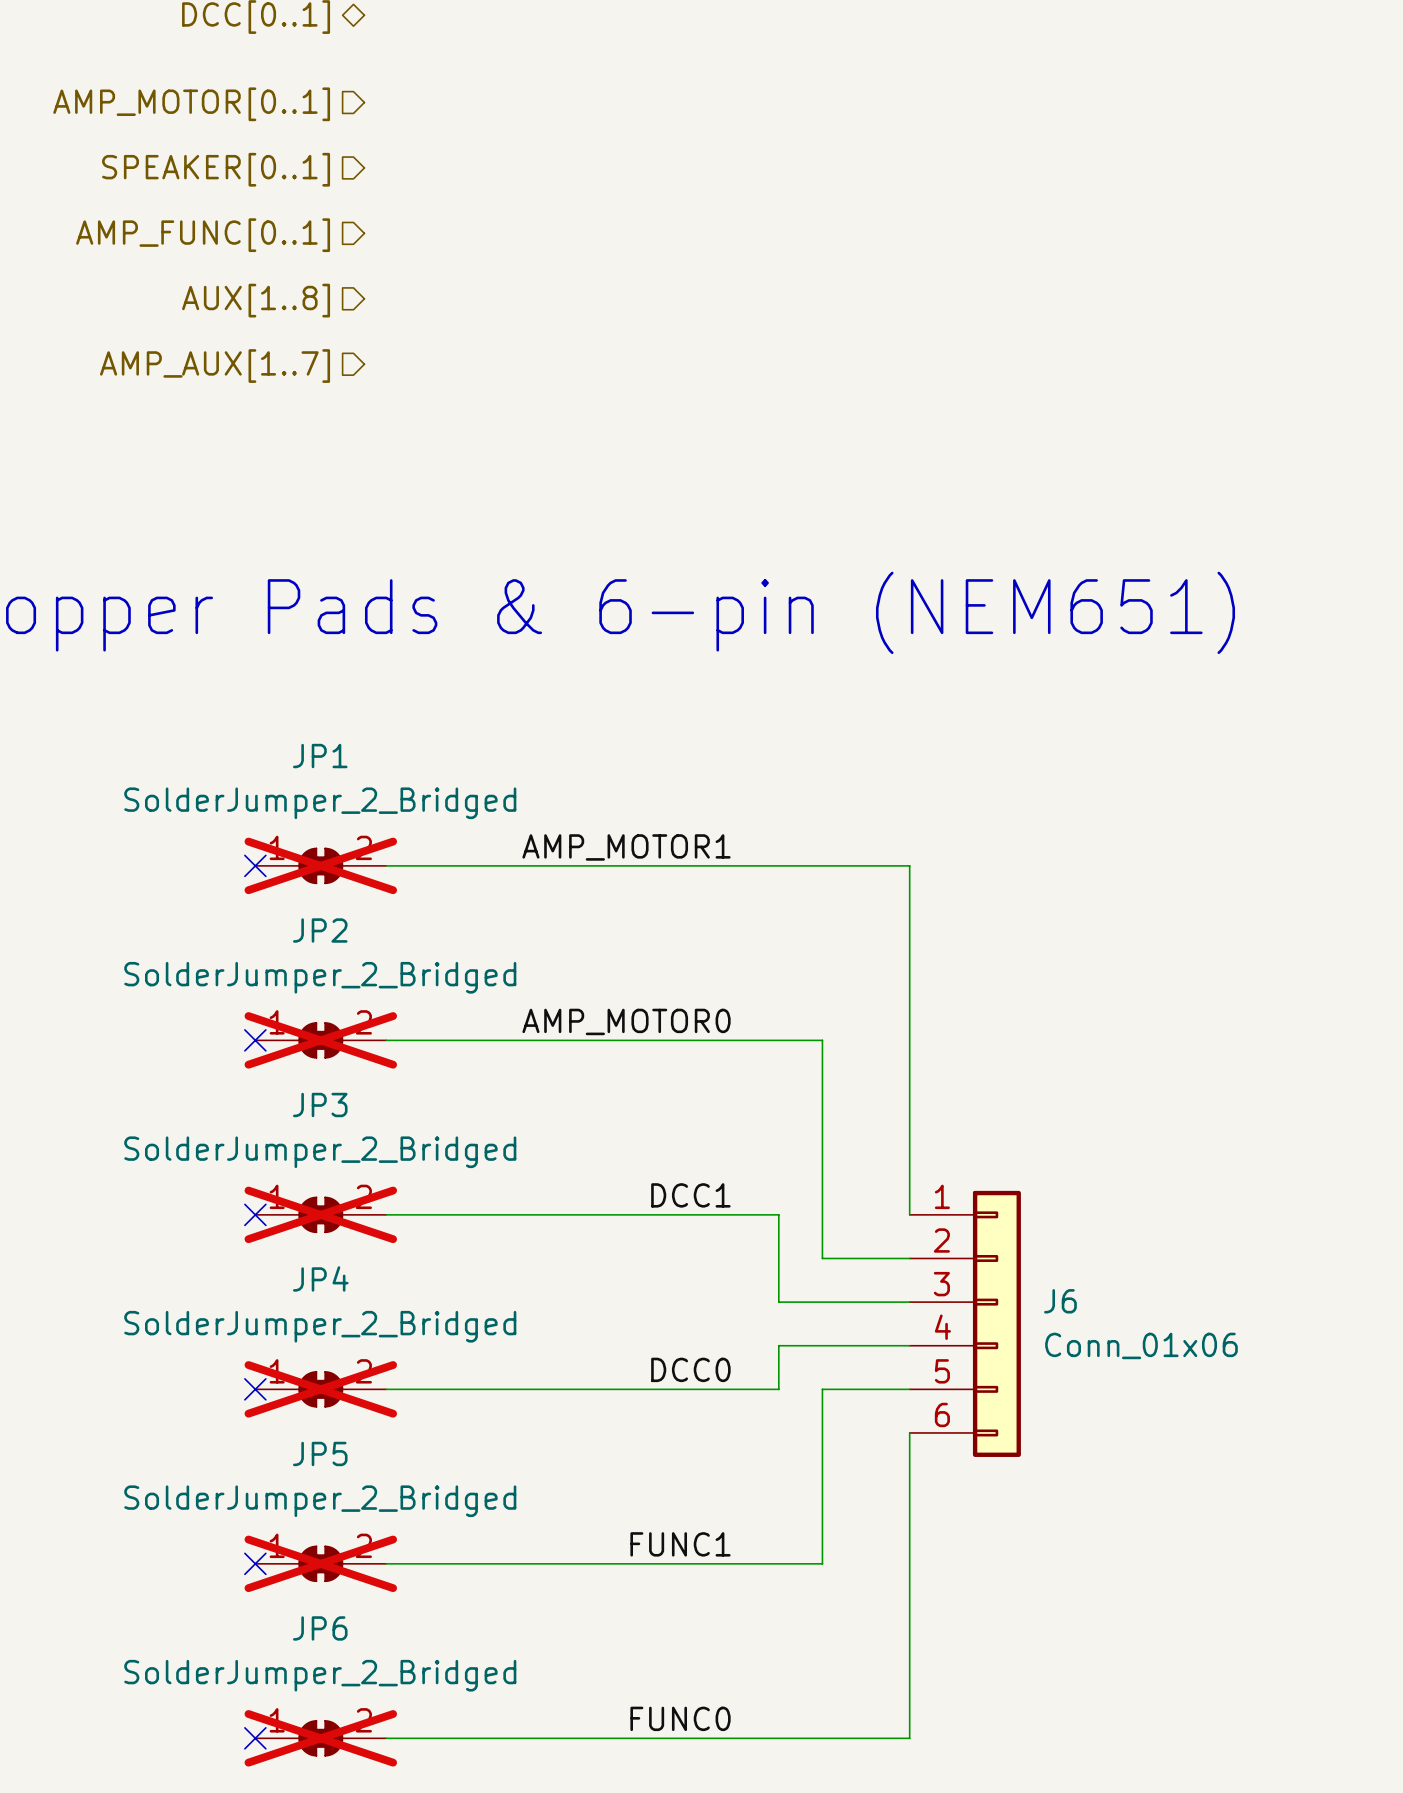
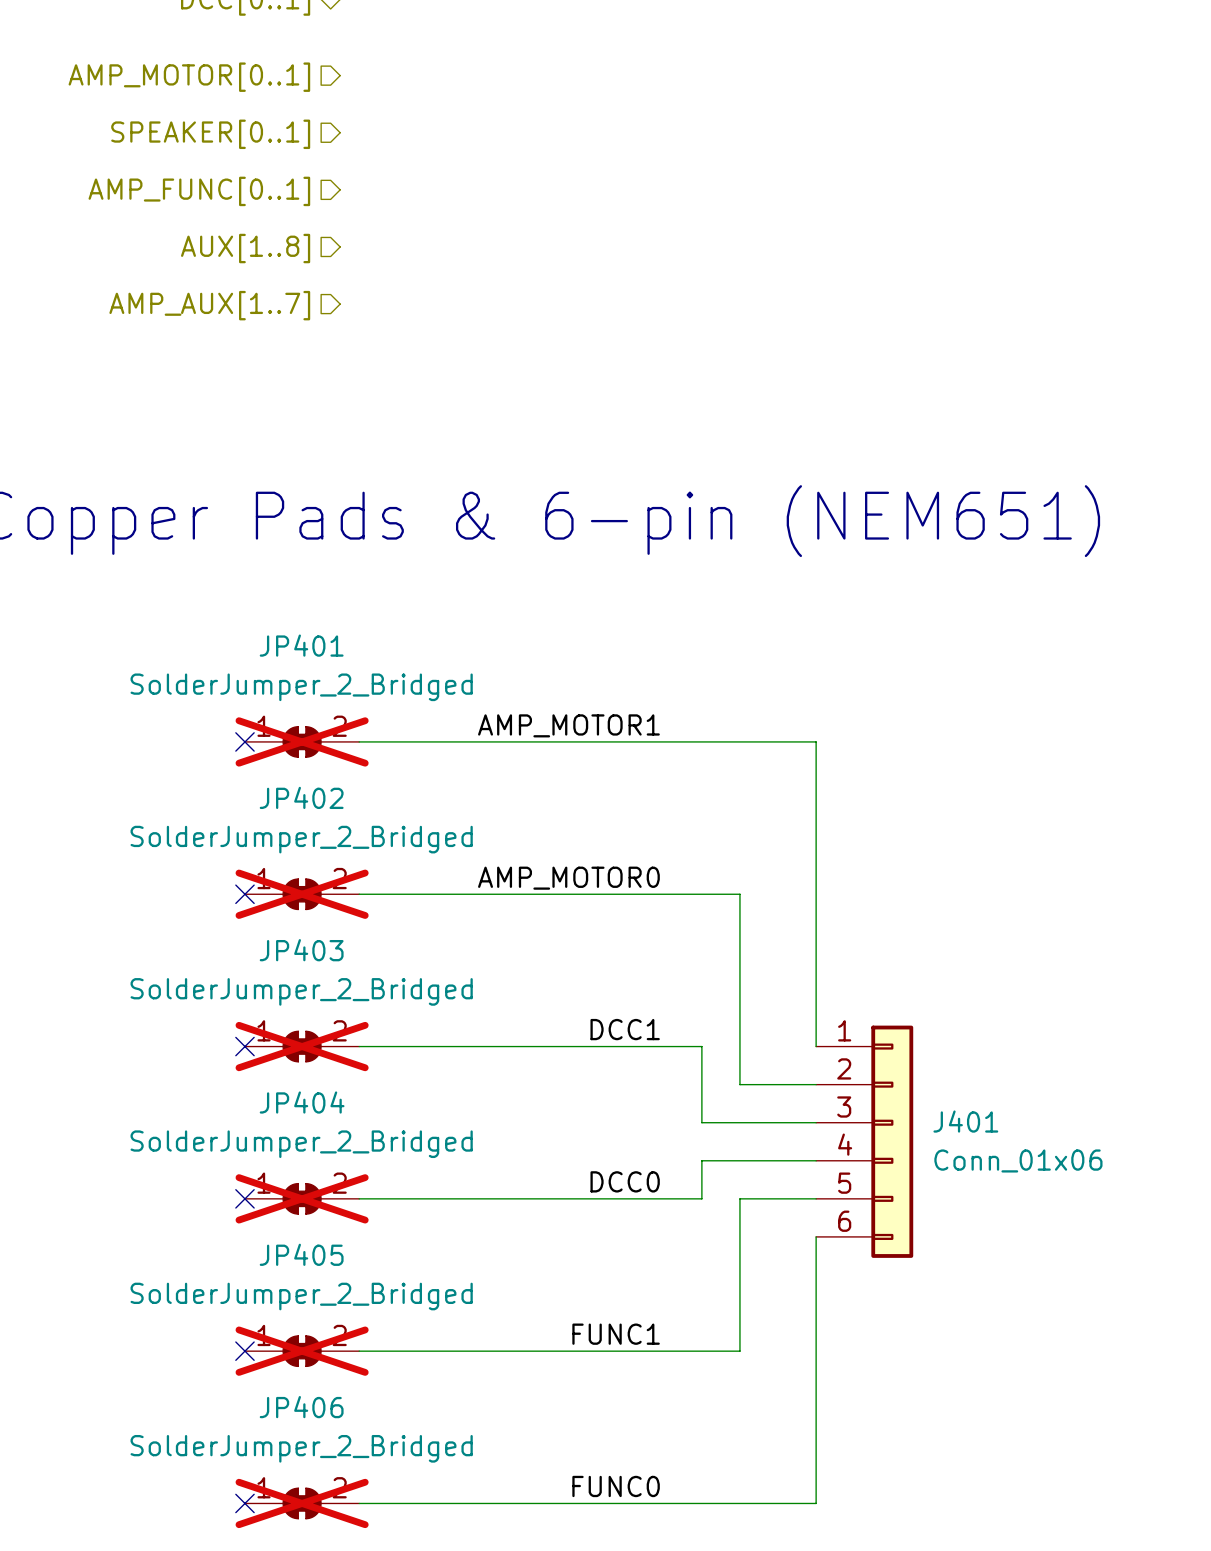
JP1 name: JP1 (320, 756) -> JP401 (301, 645)
JP2 name: JP2 (320, 930) -> JP402 (301, 797)
JP3 name: JP3 (320, 1105) -> JP403 (301, 950)
JP4 name: JP4 (320, 1278) -> JP404 (302, 1102)
J6 name: J6 (1060, 1301) -> J401 (965, 1121)
JP5 name: JP5 (320, 1453) -> JP405 (301, 1254)
JP6 name: JP6 (320, 1628) -> JP406 (301, 1407)

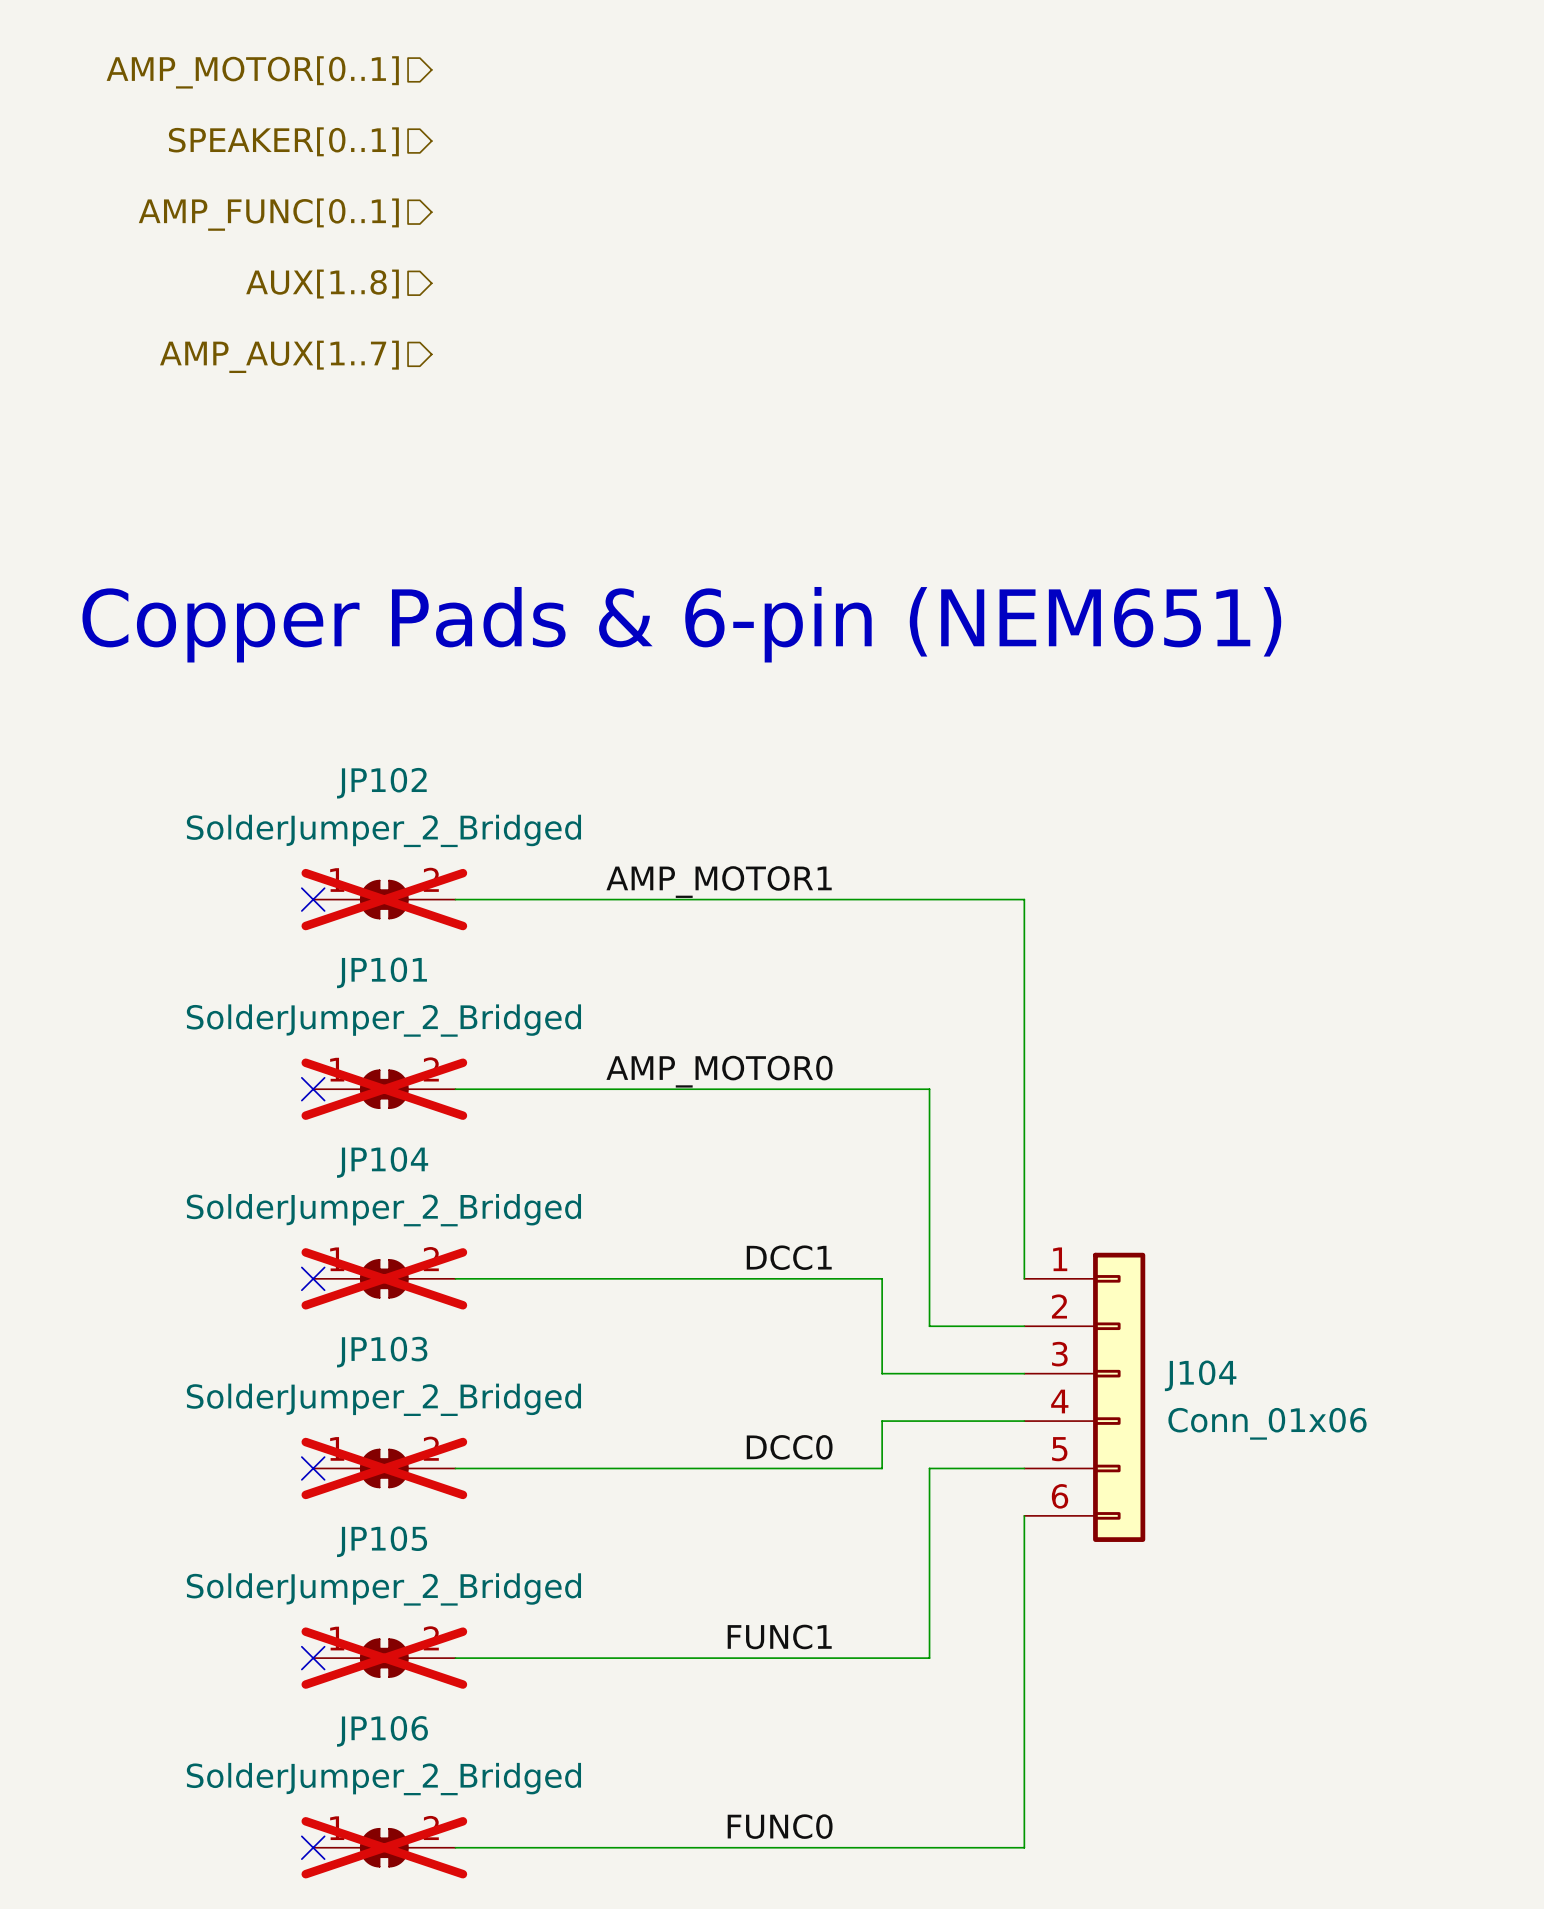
JP401 name: JP401 (301, 645) -> JP102 (381, 783)
JP402 name: JP402 (301, 797) -> JP101 (381, 972)
JP403 name: JP403 (301, 950) -> JP104 (382, 1162)
JP404 name: JP404 (302, 1102) -> JP103 (382, 1352)
J401 name: J401 (965, 1121) -> J104 (1200, 1375)
JP405 name: JP405 (301, 1254) -> JP105 (382, 1541)
JP406 name: JP406 (301, 1407) -> JP106 (382, 1731)

